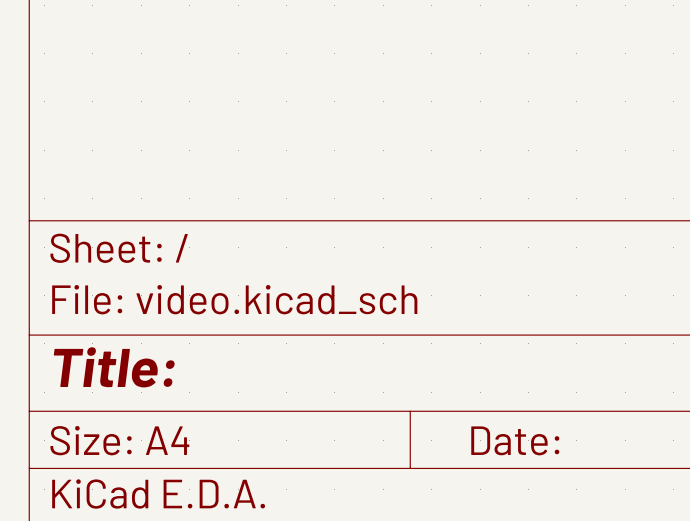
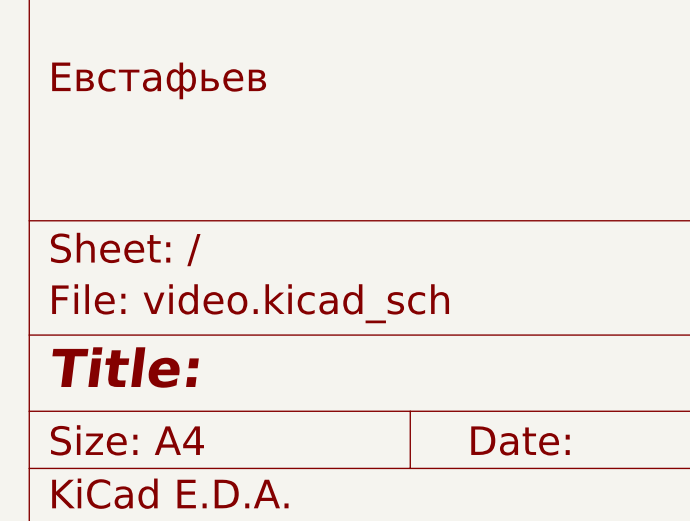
title block: none -> Евстафьев (159, 80)

